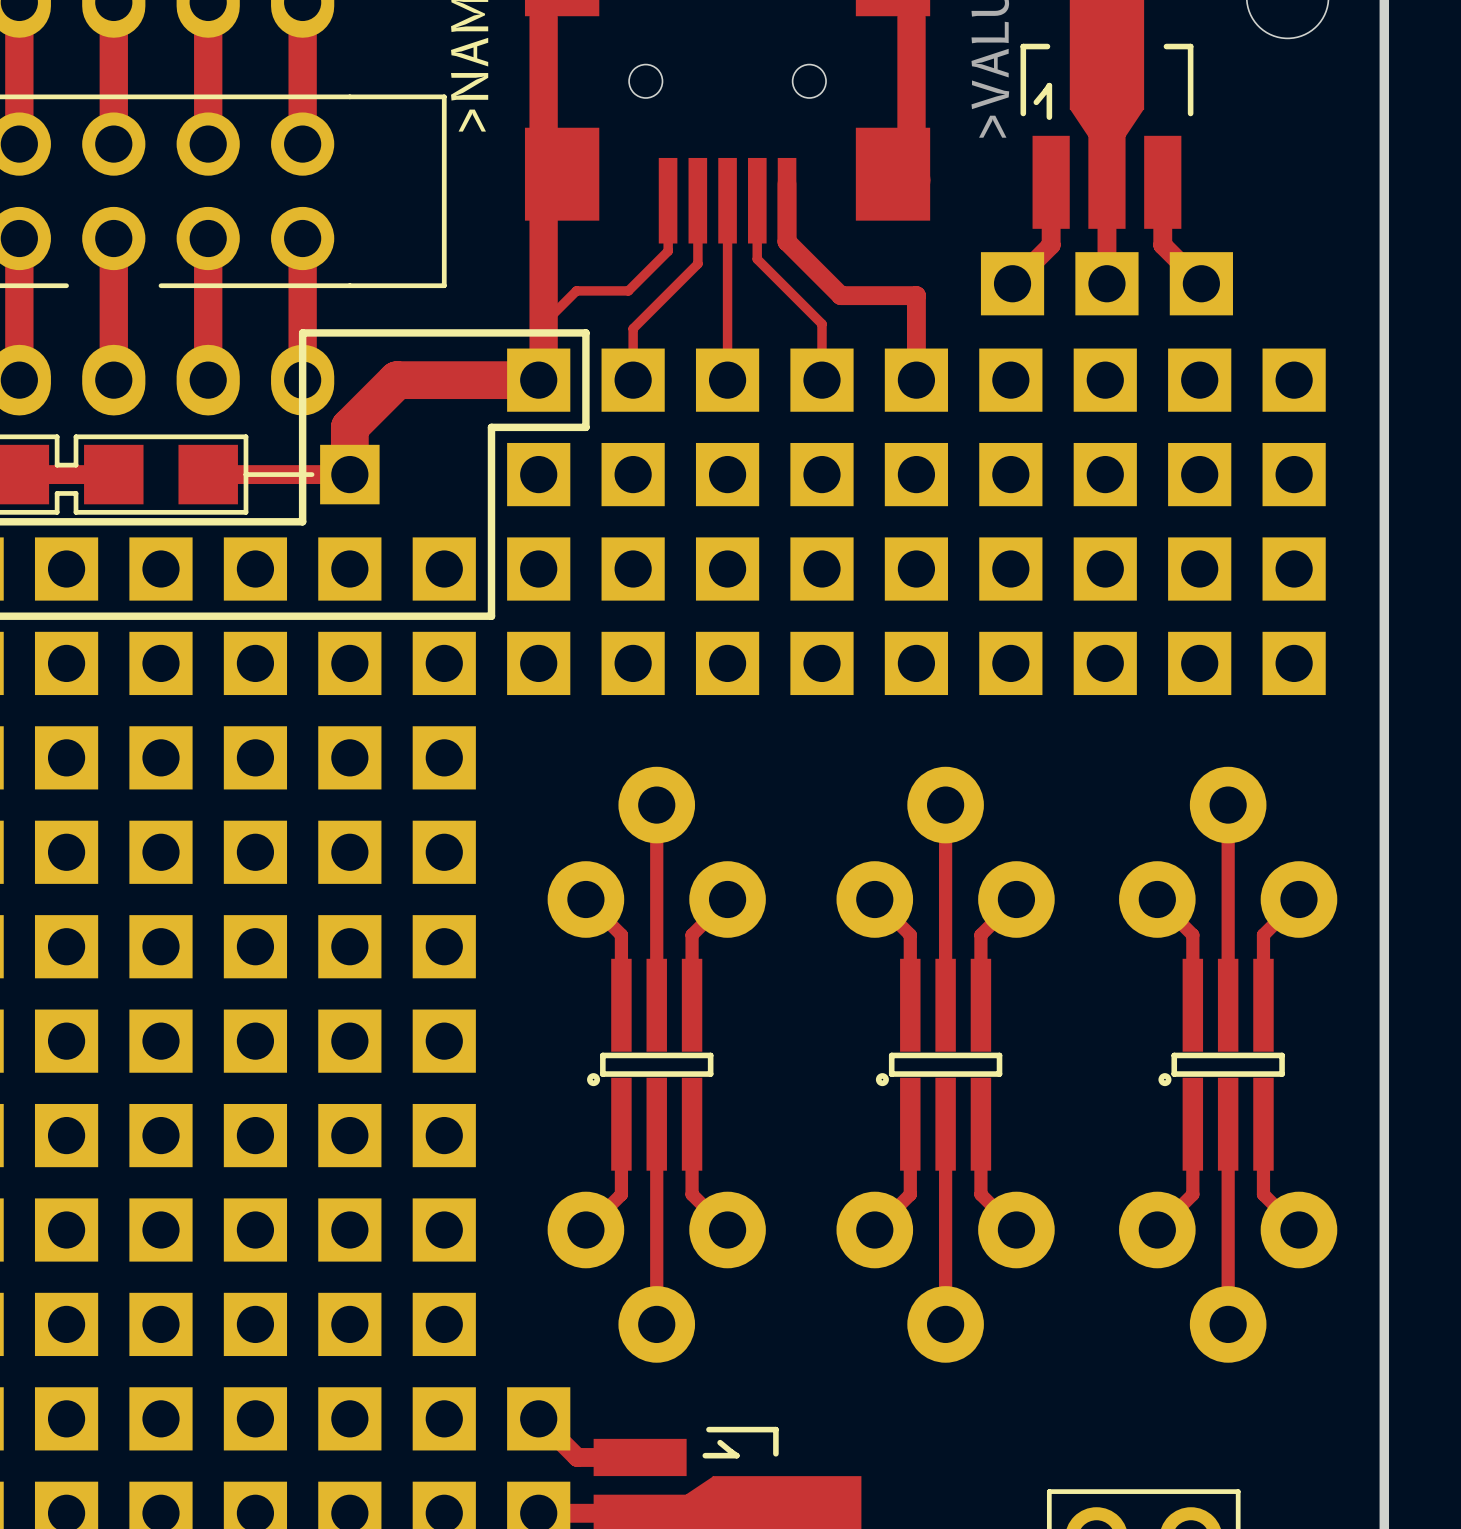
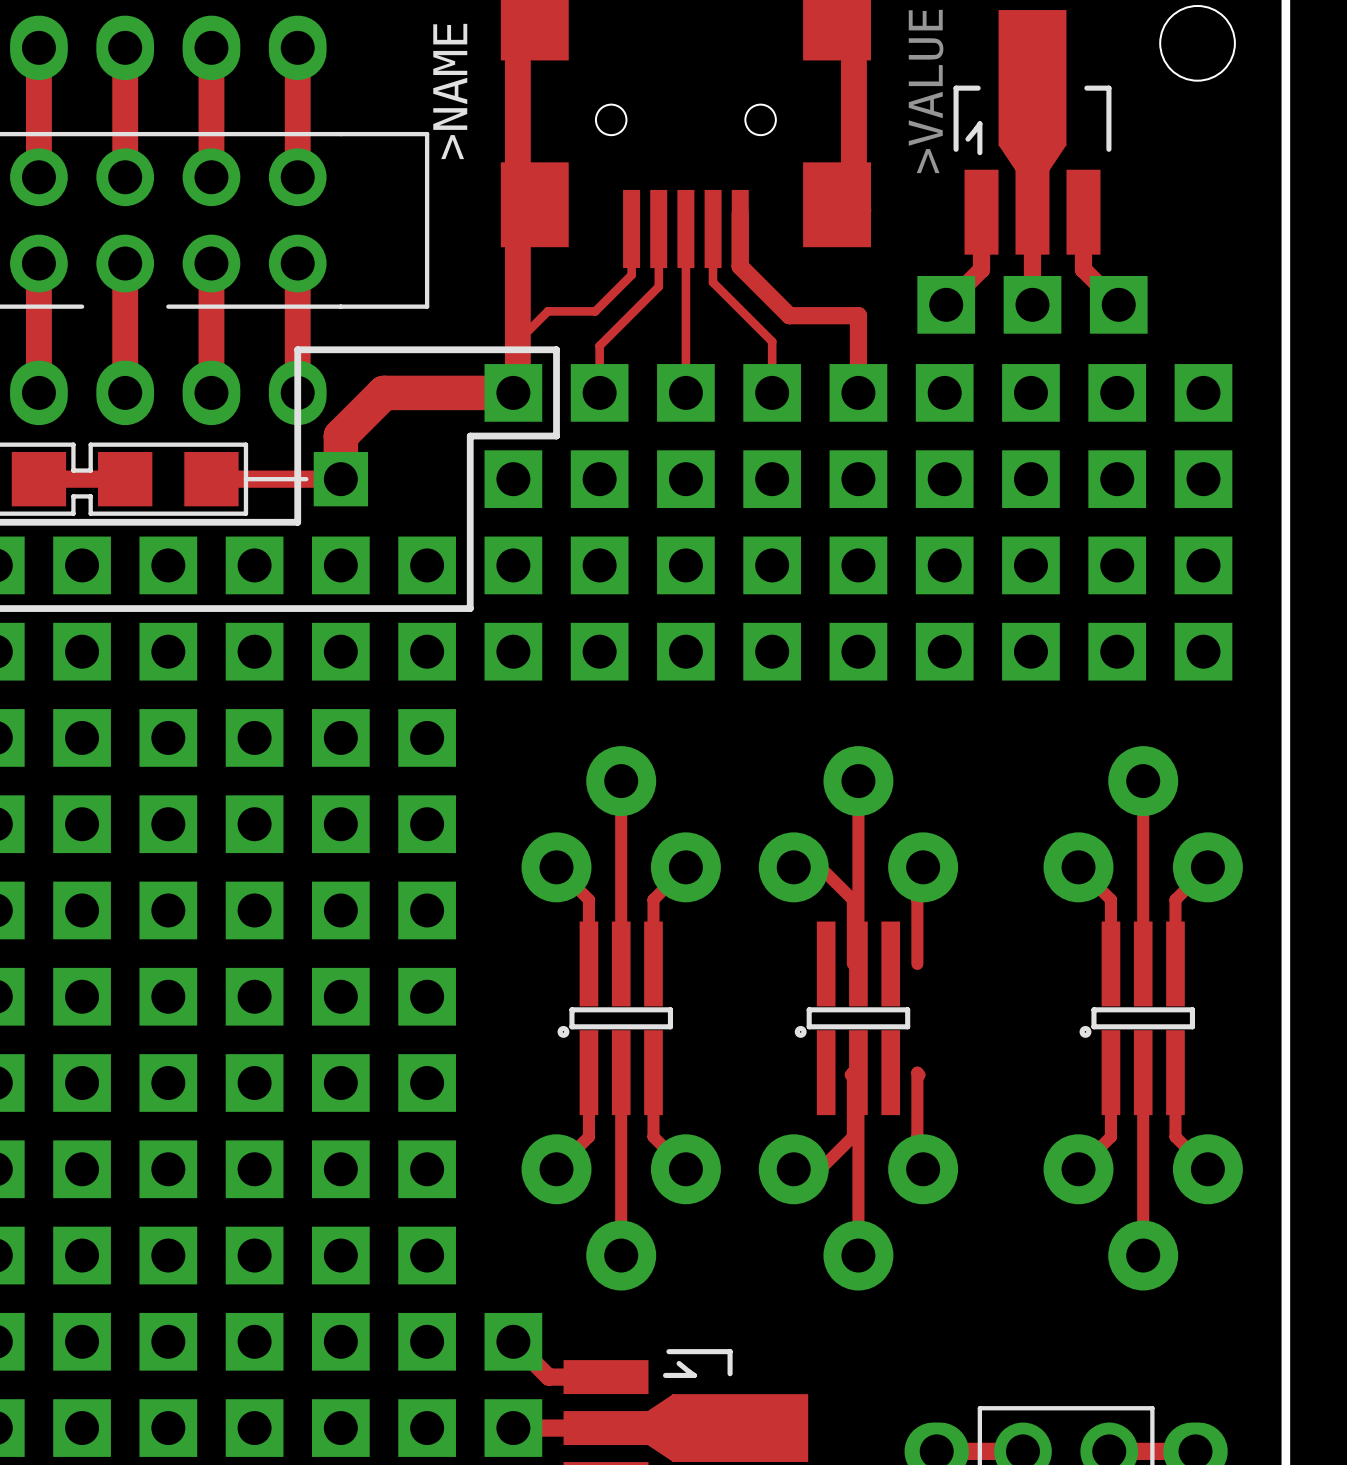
track: (945, 805) (945, 1005) -> (858, 781) (858, 963)
part position: (945, 1064) -> (858, 1018)
track: (945, 1124) (945, 1324) -> (858, 1072) (858, 1255)

